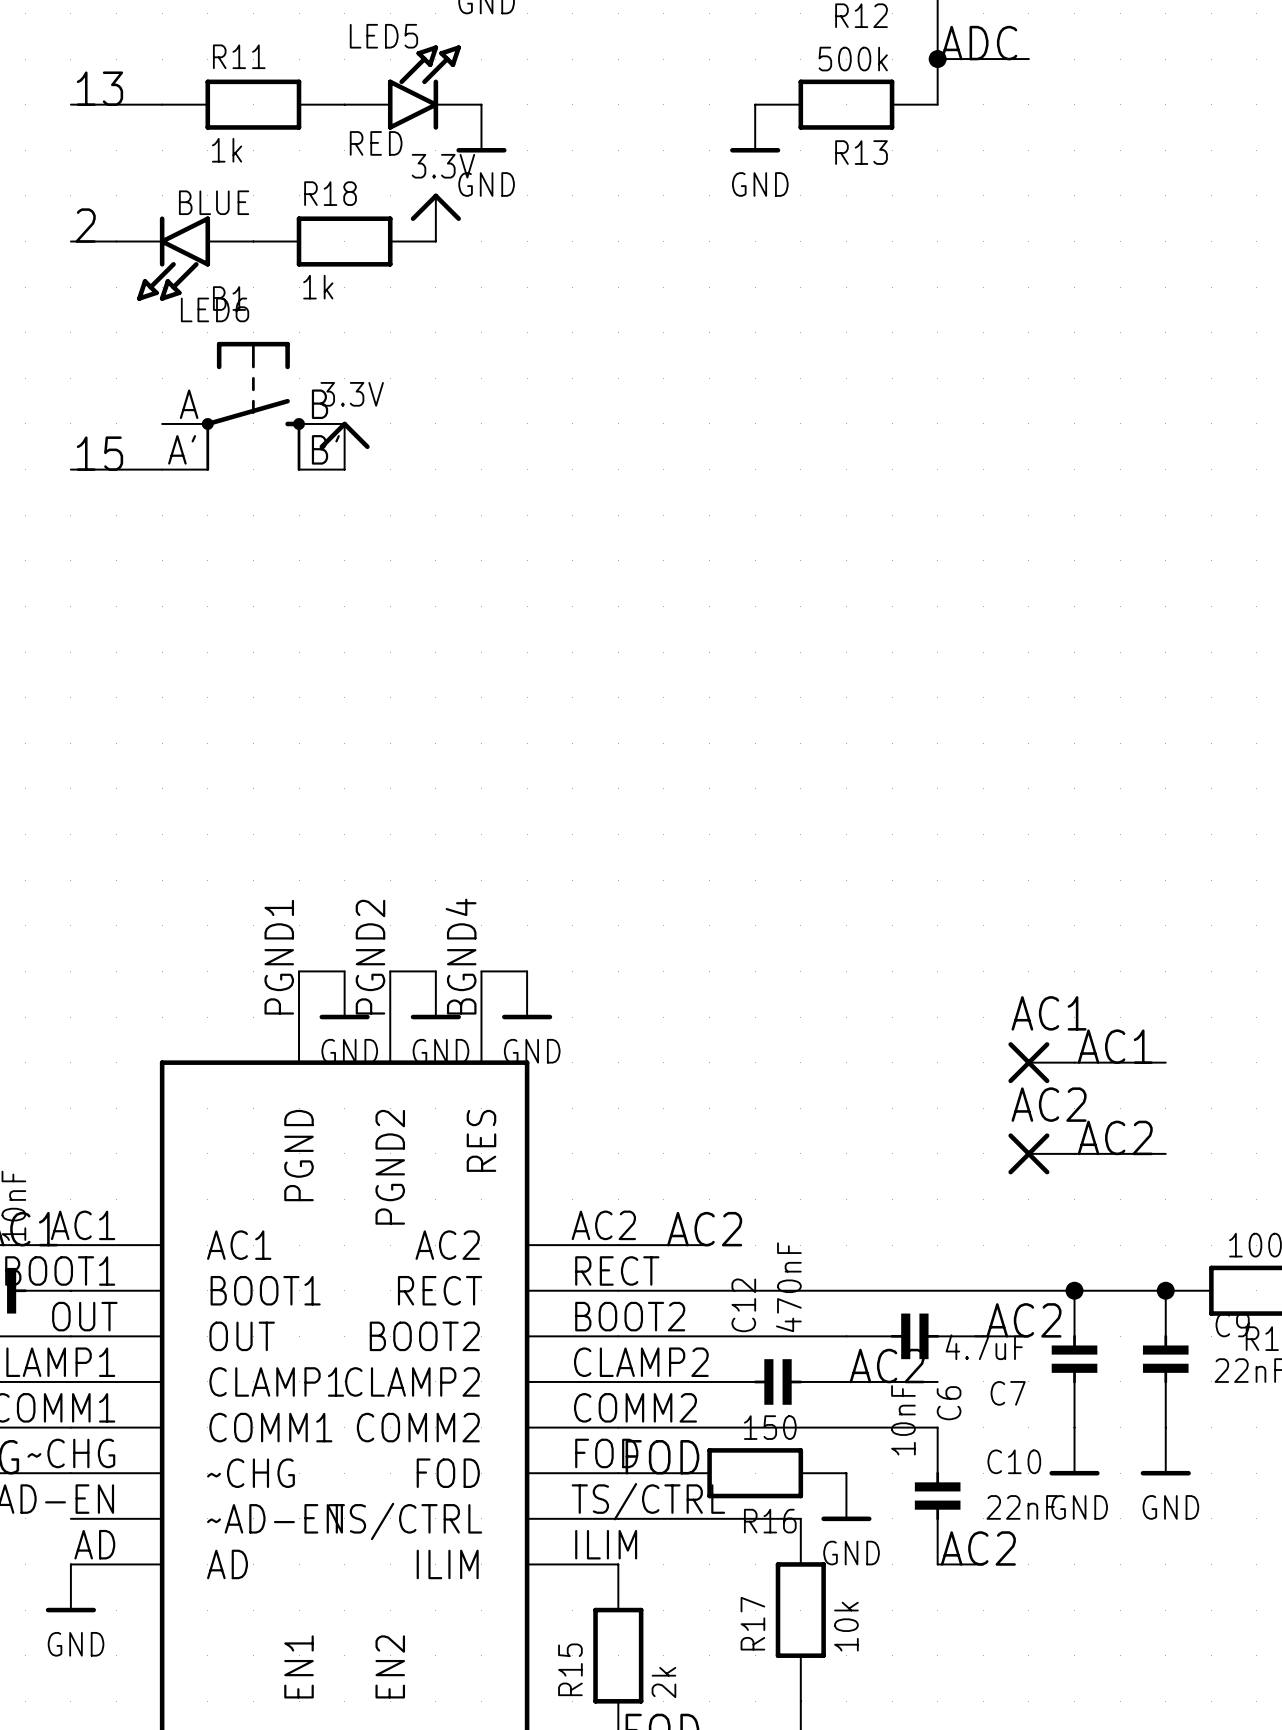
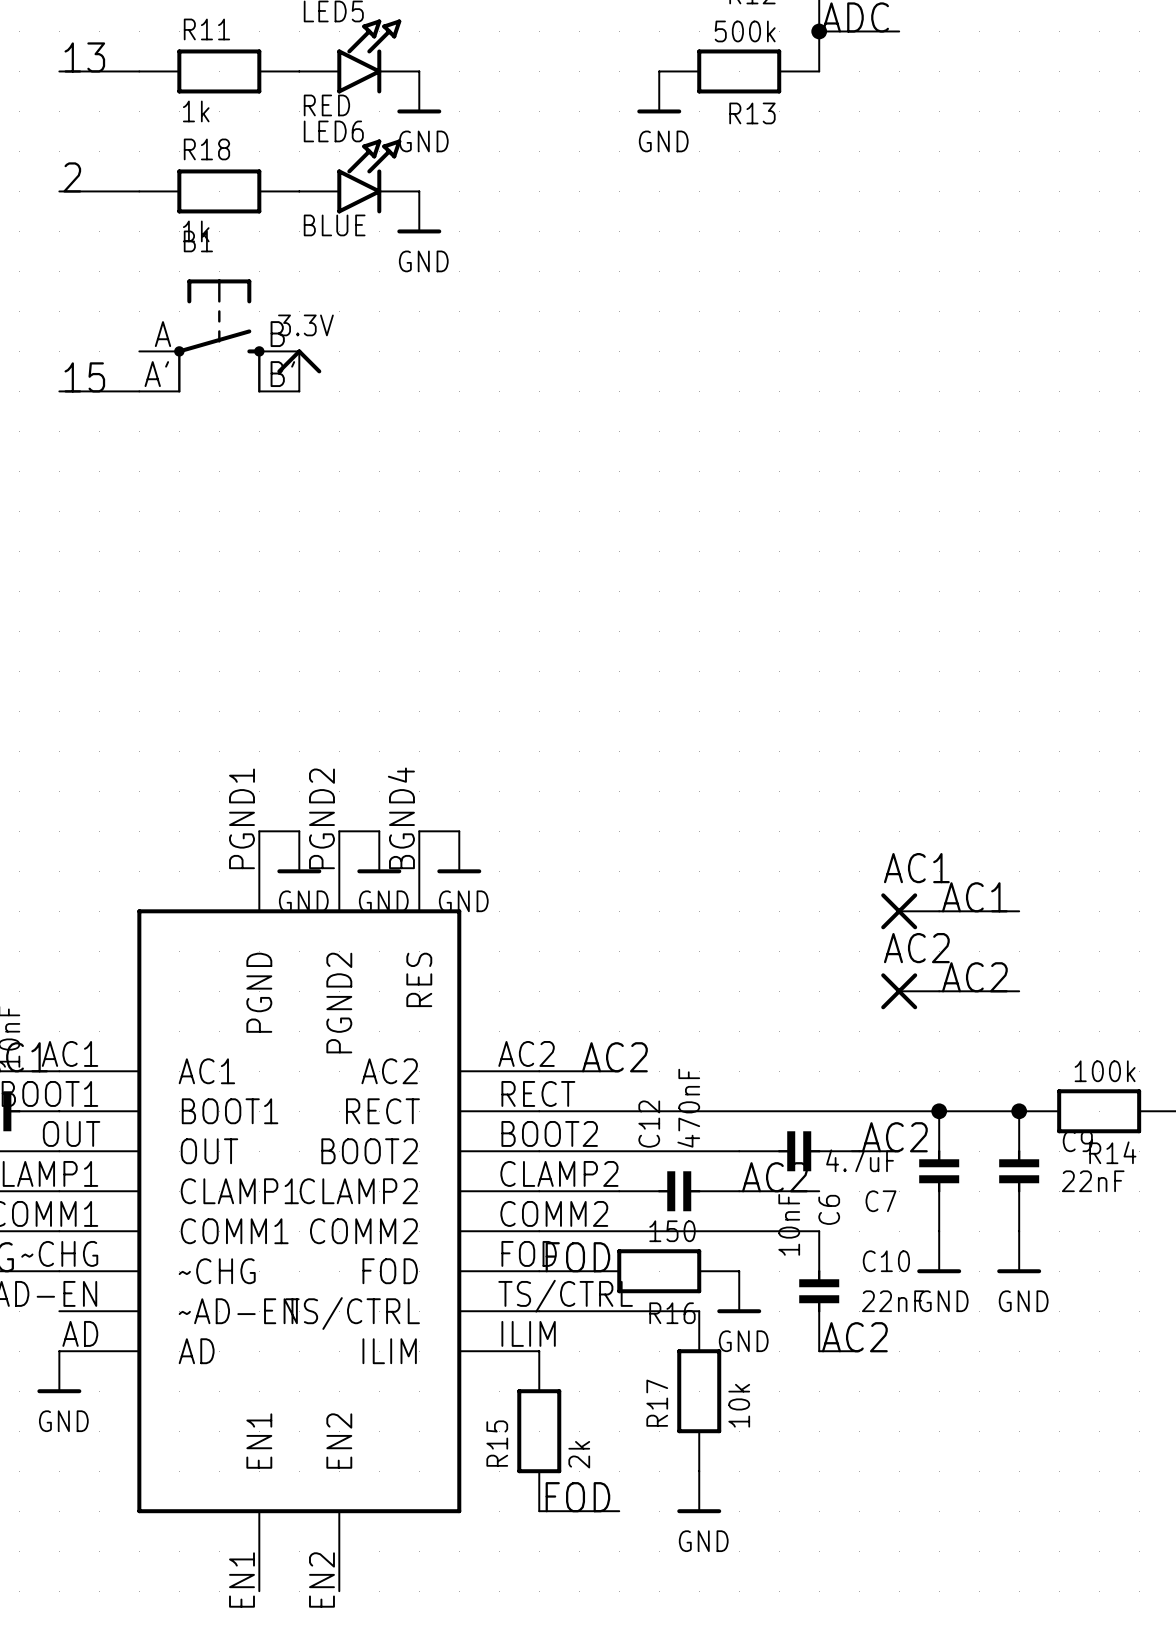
power symbol: 3.3V (435, 217) -> none
R18 position: (344, 241) -> (219, 191)
LED6 rotation: 0° (173, 258) -> 180° (369, 176)
LED6 position: (184, 258) -> (359, 176)
power symbol: none -> GND (419, 212)

